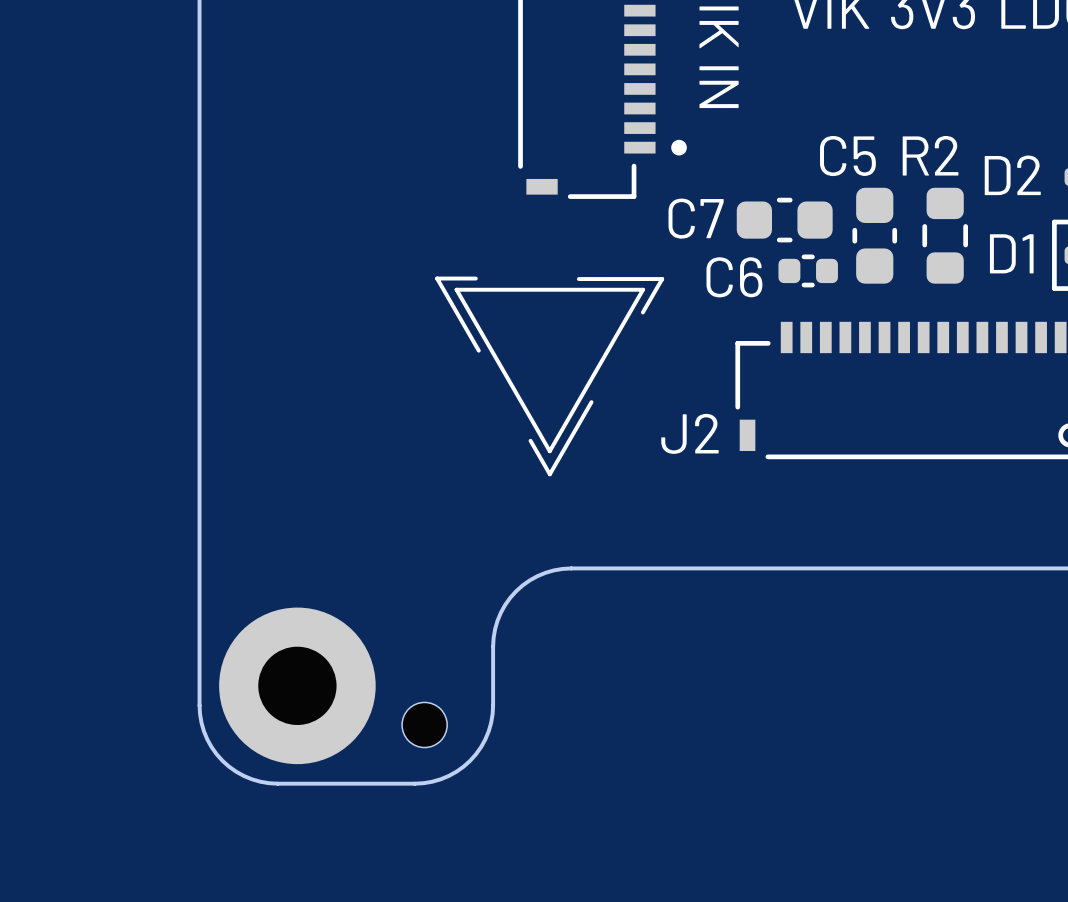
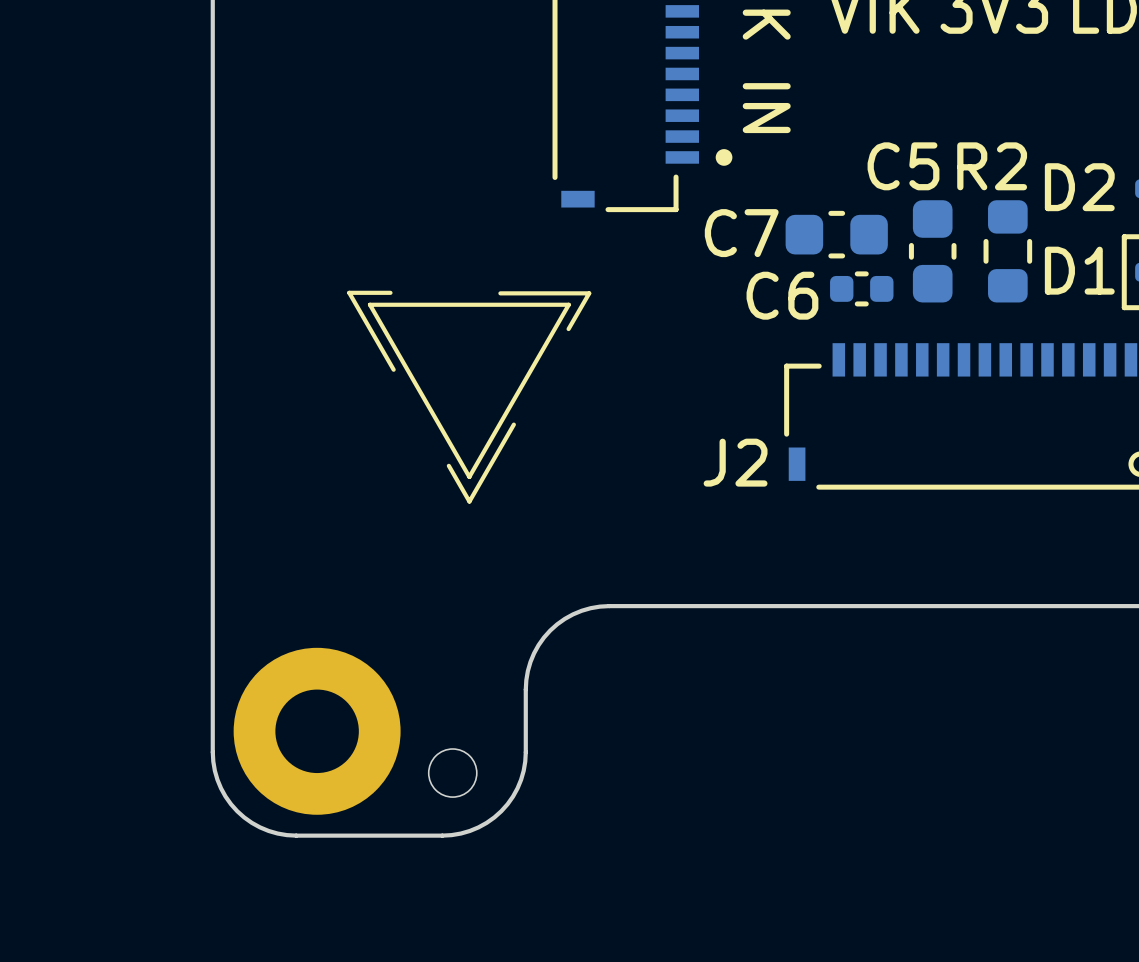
drawing position: (549, 376) -> (469, 397)

